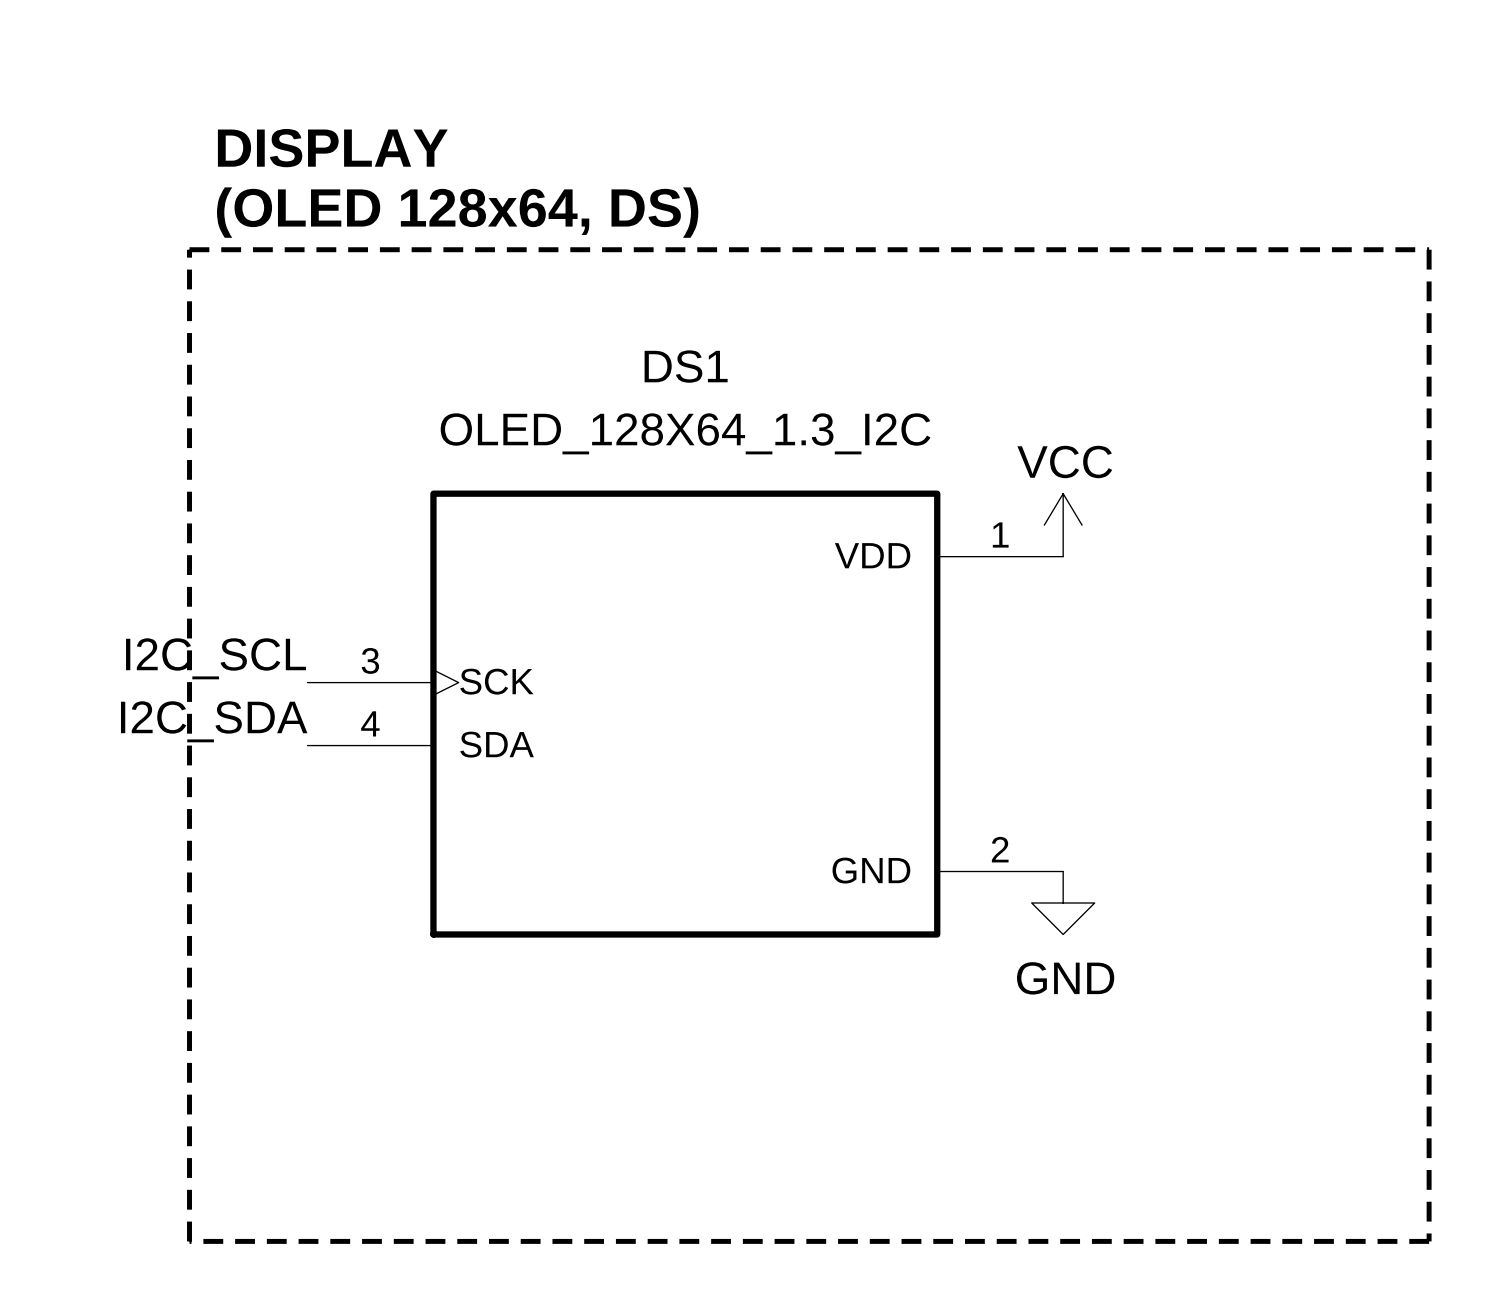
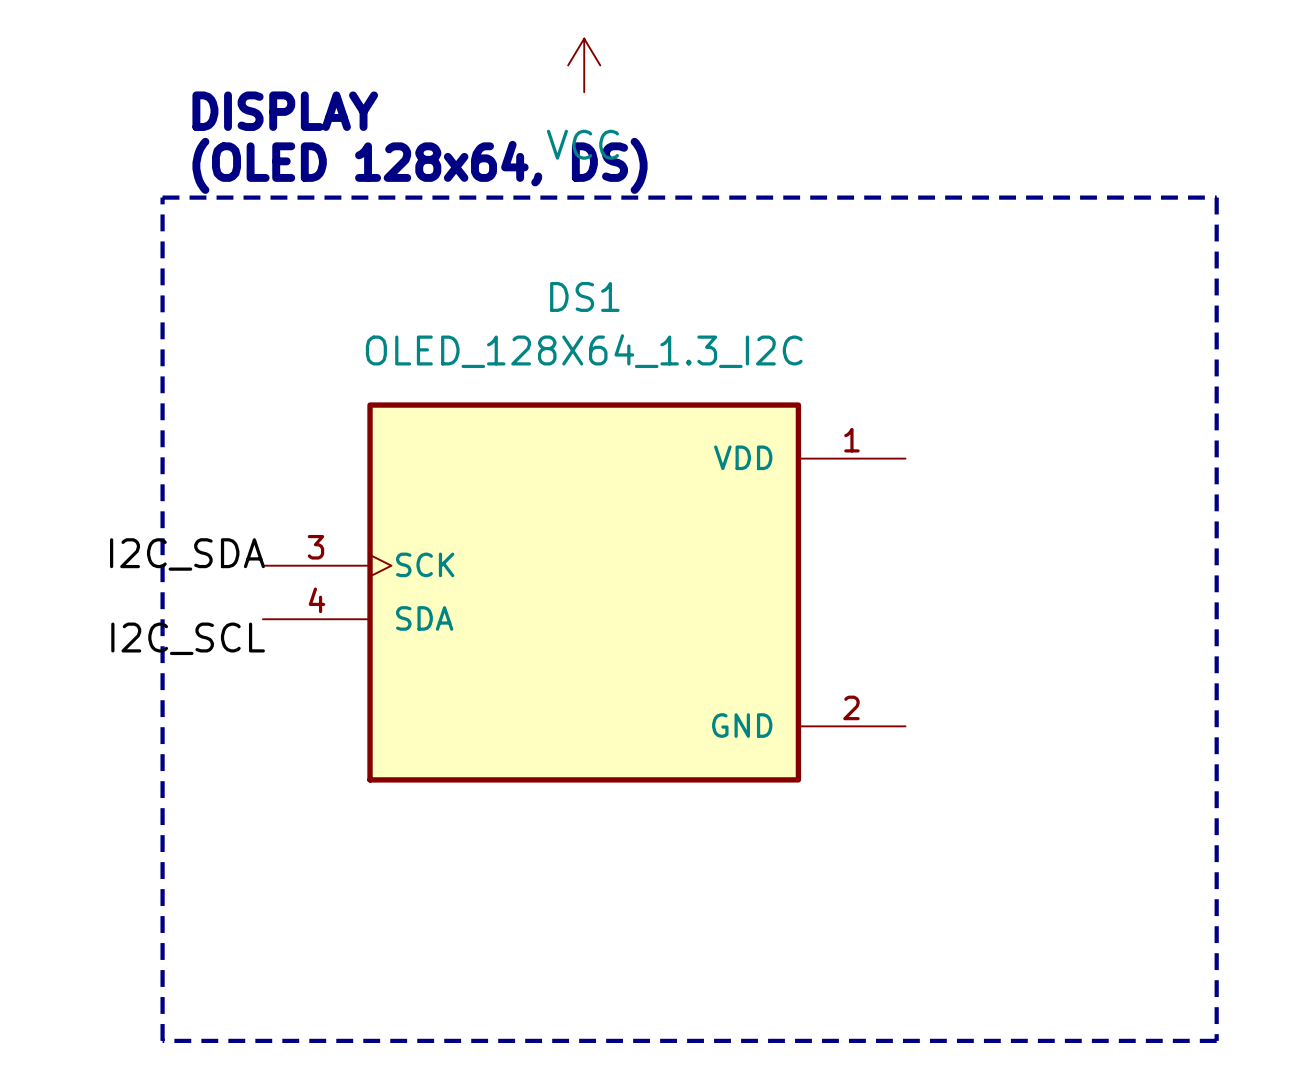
power symbol text position: VCC (1064, 461) -> VCC (582, 144)
power symbol position: VCC (1063, 525) -> VCC (584, 65)
label position: I2C_SCL (216, 658) -> I2C_SCL (188, 638)
label position: I2C_SDA (214, 721) -> I2C_SDA (187, 554)
power symbol: GND (1063, 902) -> none

